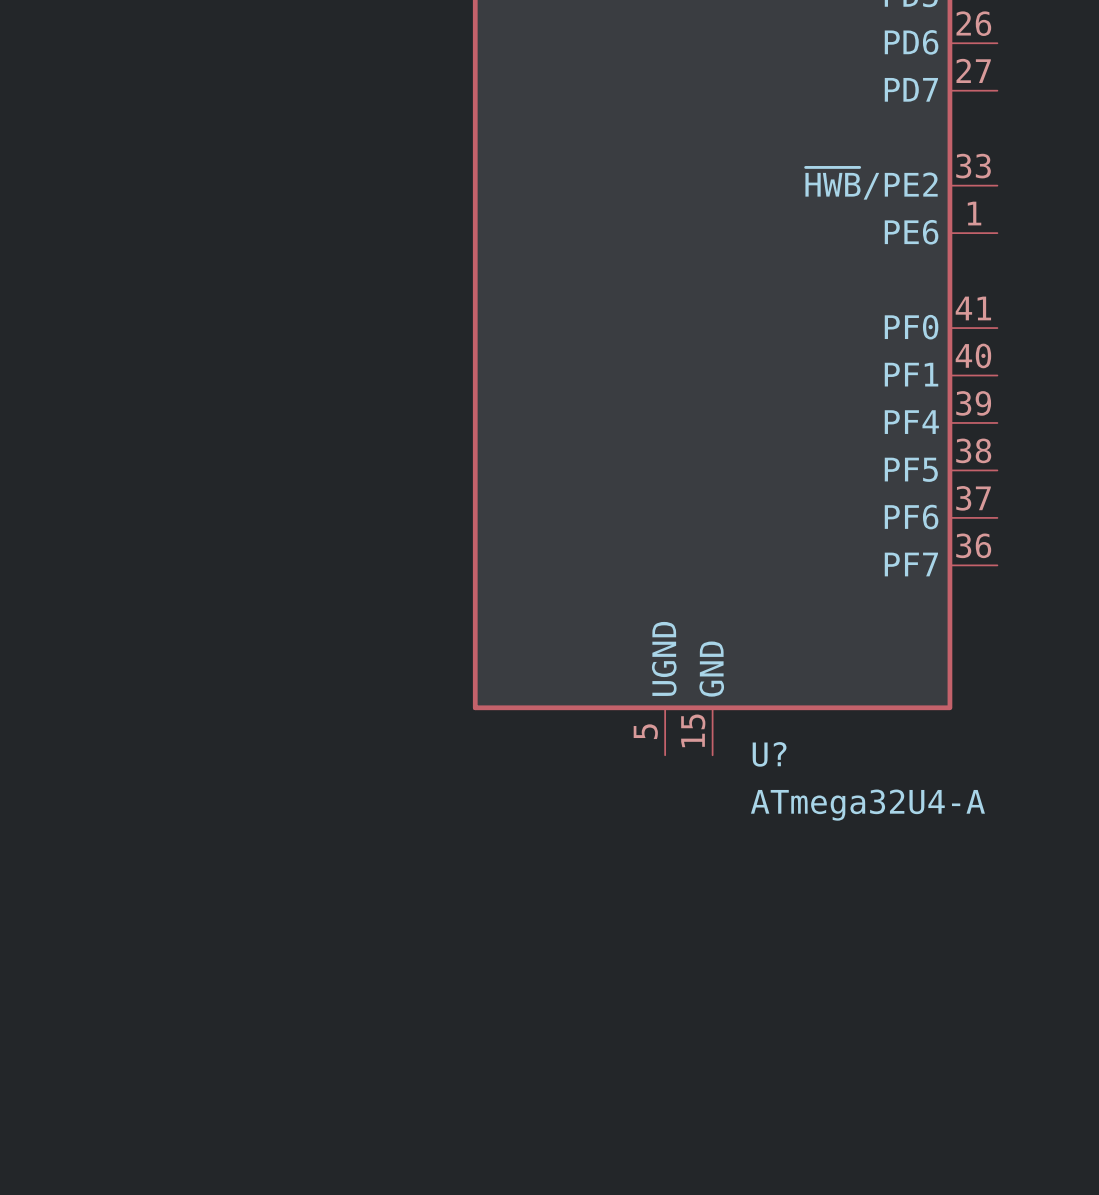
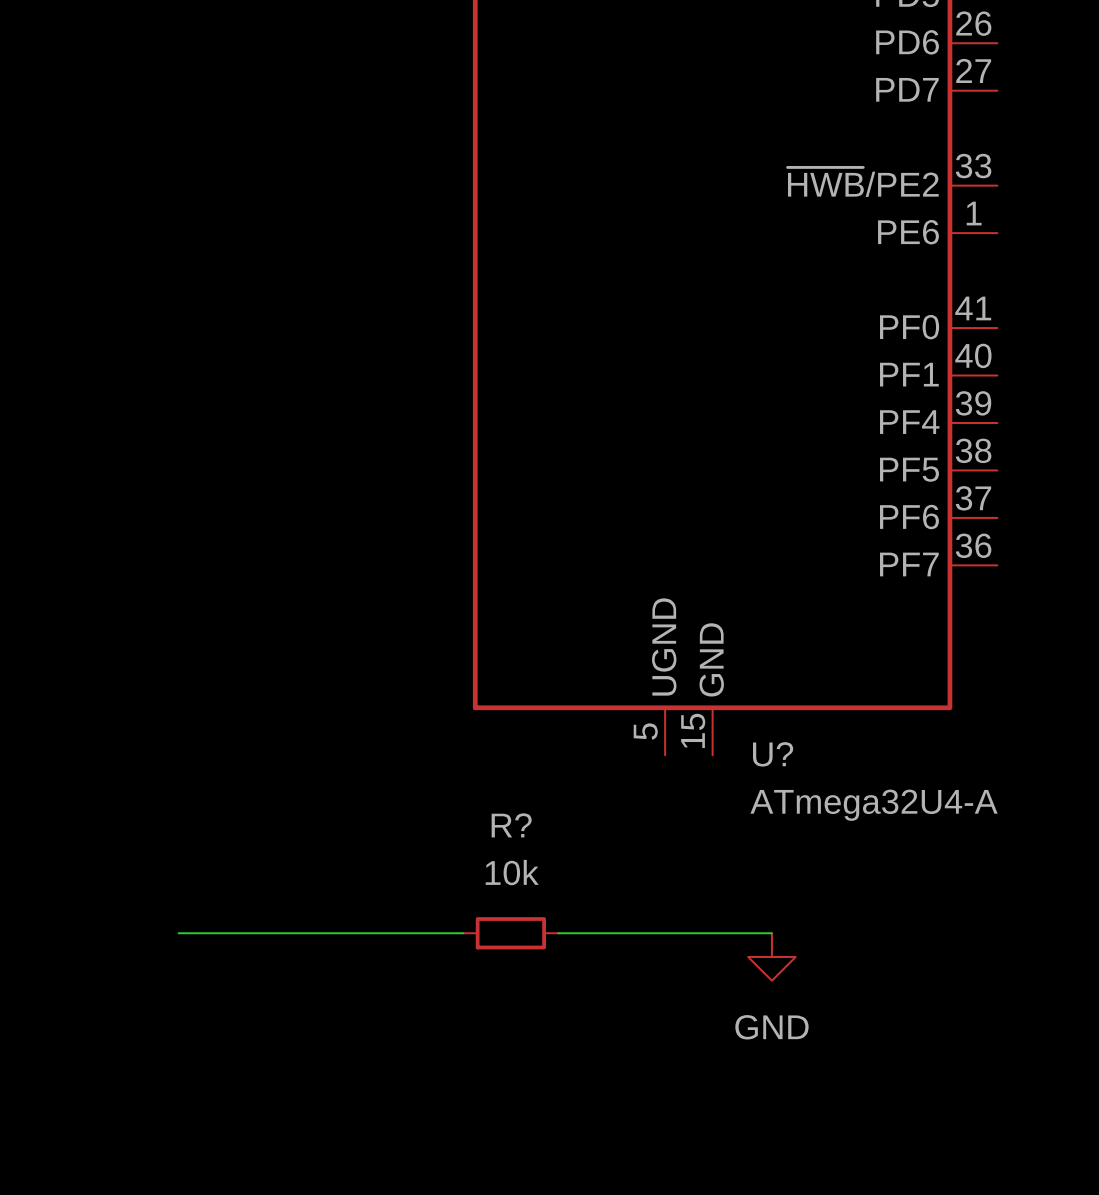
wire: none -> (178, 933) (463, 933)
R?: none -> 10k (510, 933)
wire: none -> (558, 933) (771, 933)
power symbol: none -> GND (771, 956)

